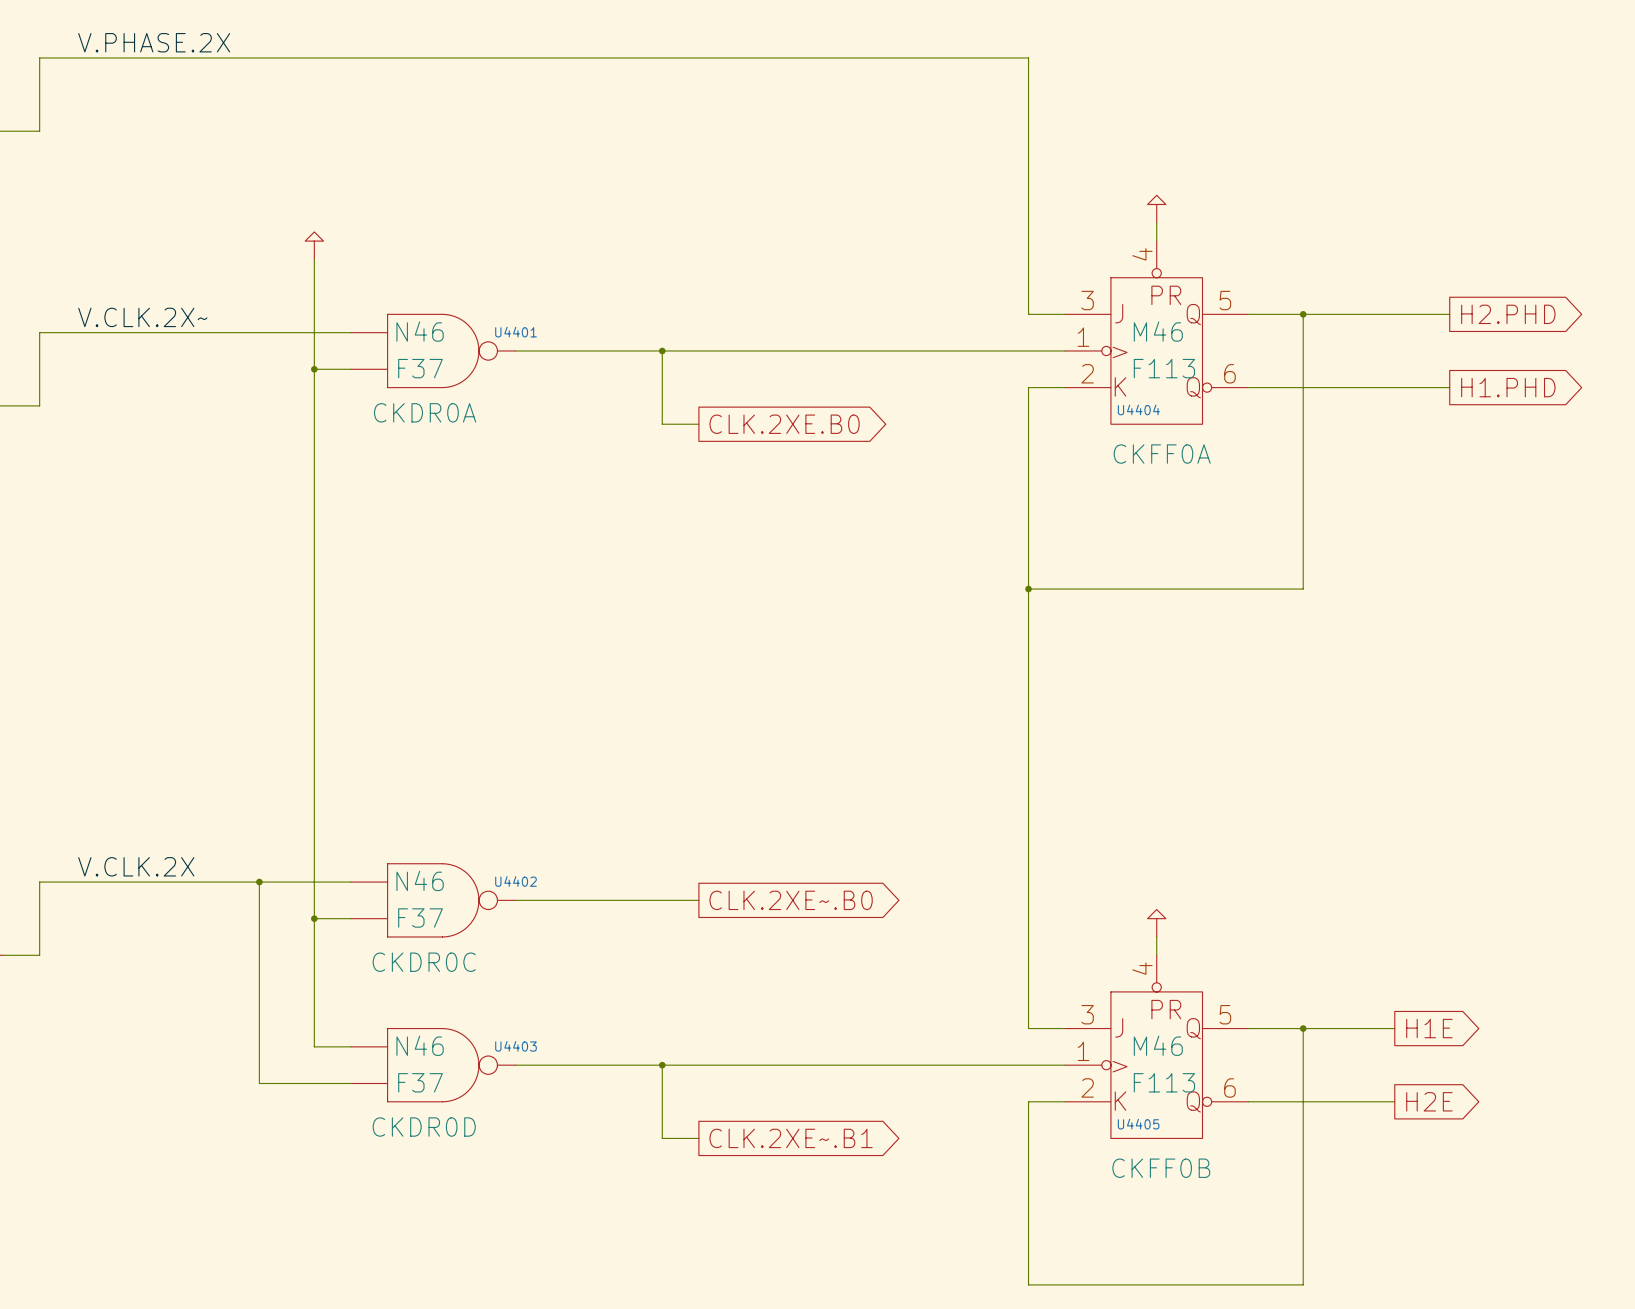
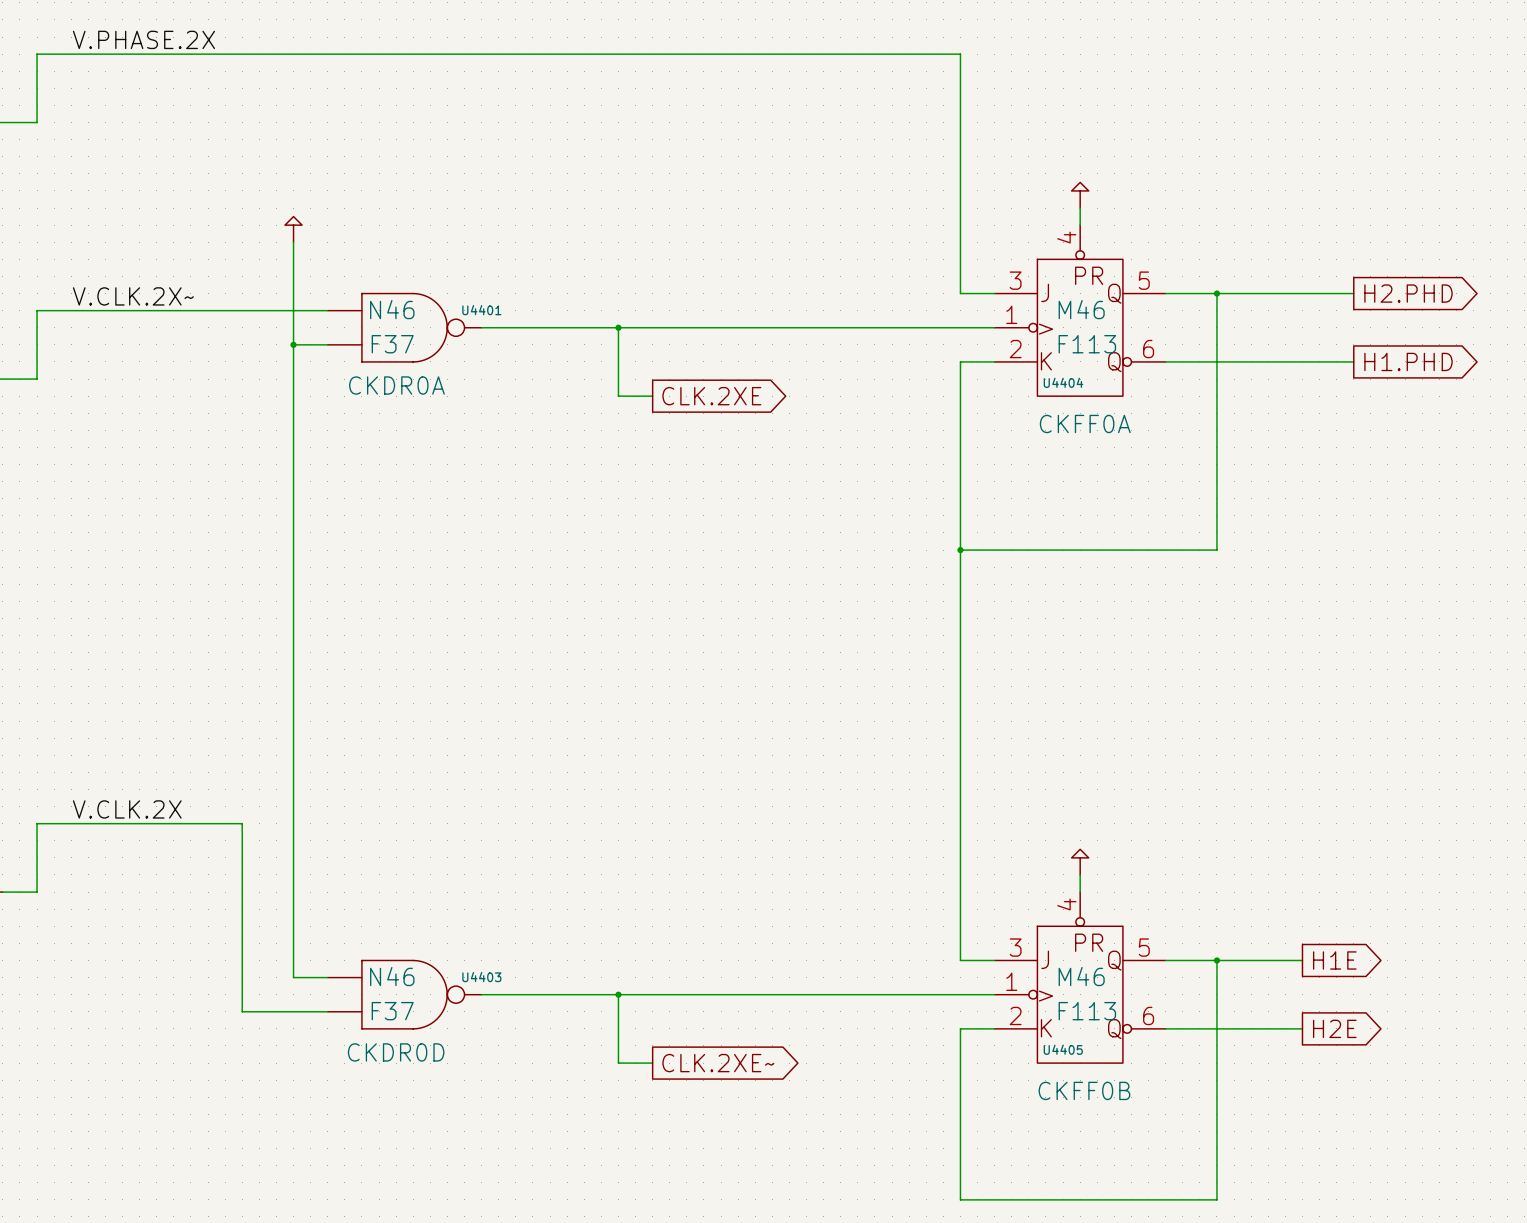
global label: CLK.2XE.B0 (784, 424) -> CLK.2XE (711, 396)
wire: (259, 882) (350, 882) -> none
junction: (259, 882) -> none
U4402: F37 (433, 900) -> none
wire: (515, 900) (698, 900) -> none
global label: CLK.2XE~.B0 (791, 900) -> none
wire: (314, 918) (350, 918) -> none
junction: (314, 918) -> none
global label: CLK.2XE~.B1 (791, 1138) -> CLK.2XE~ (718, 1063)

